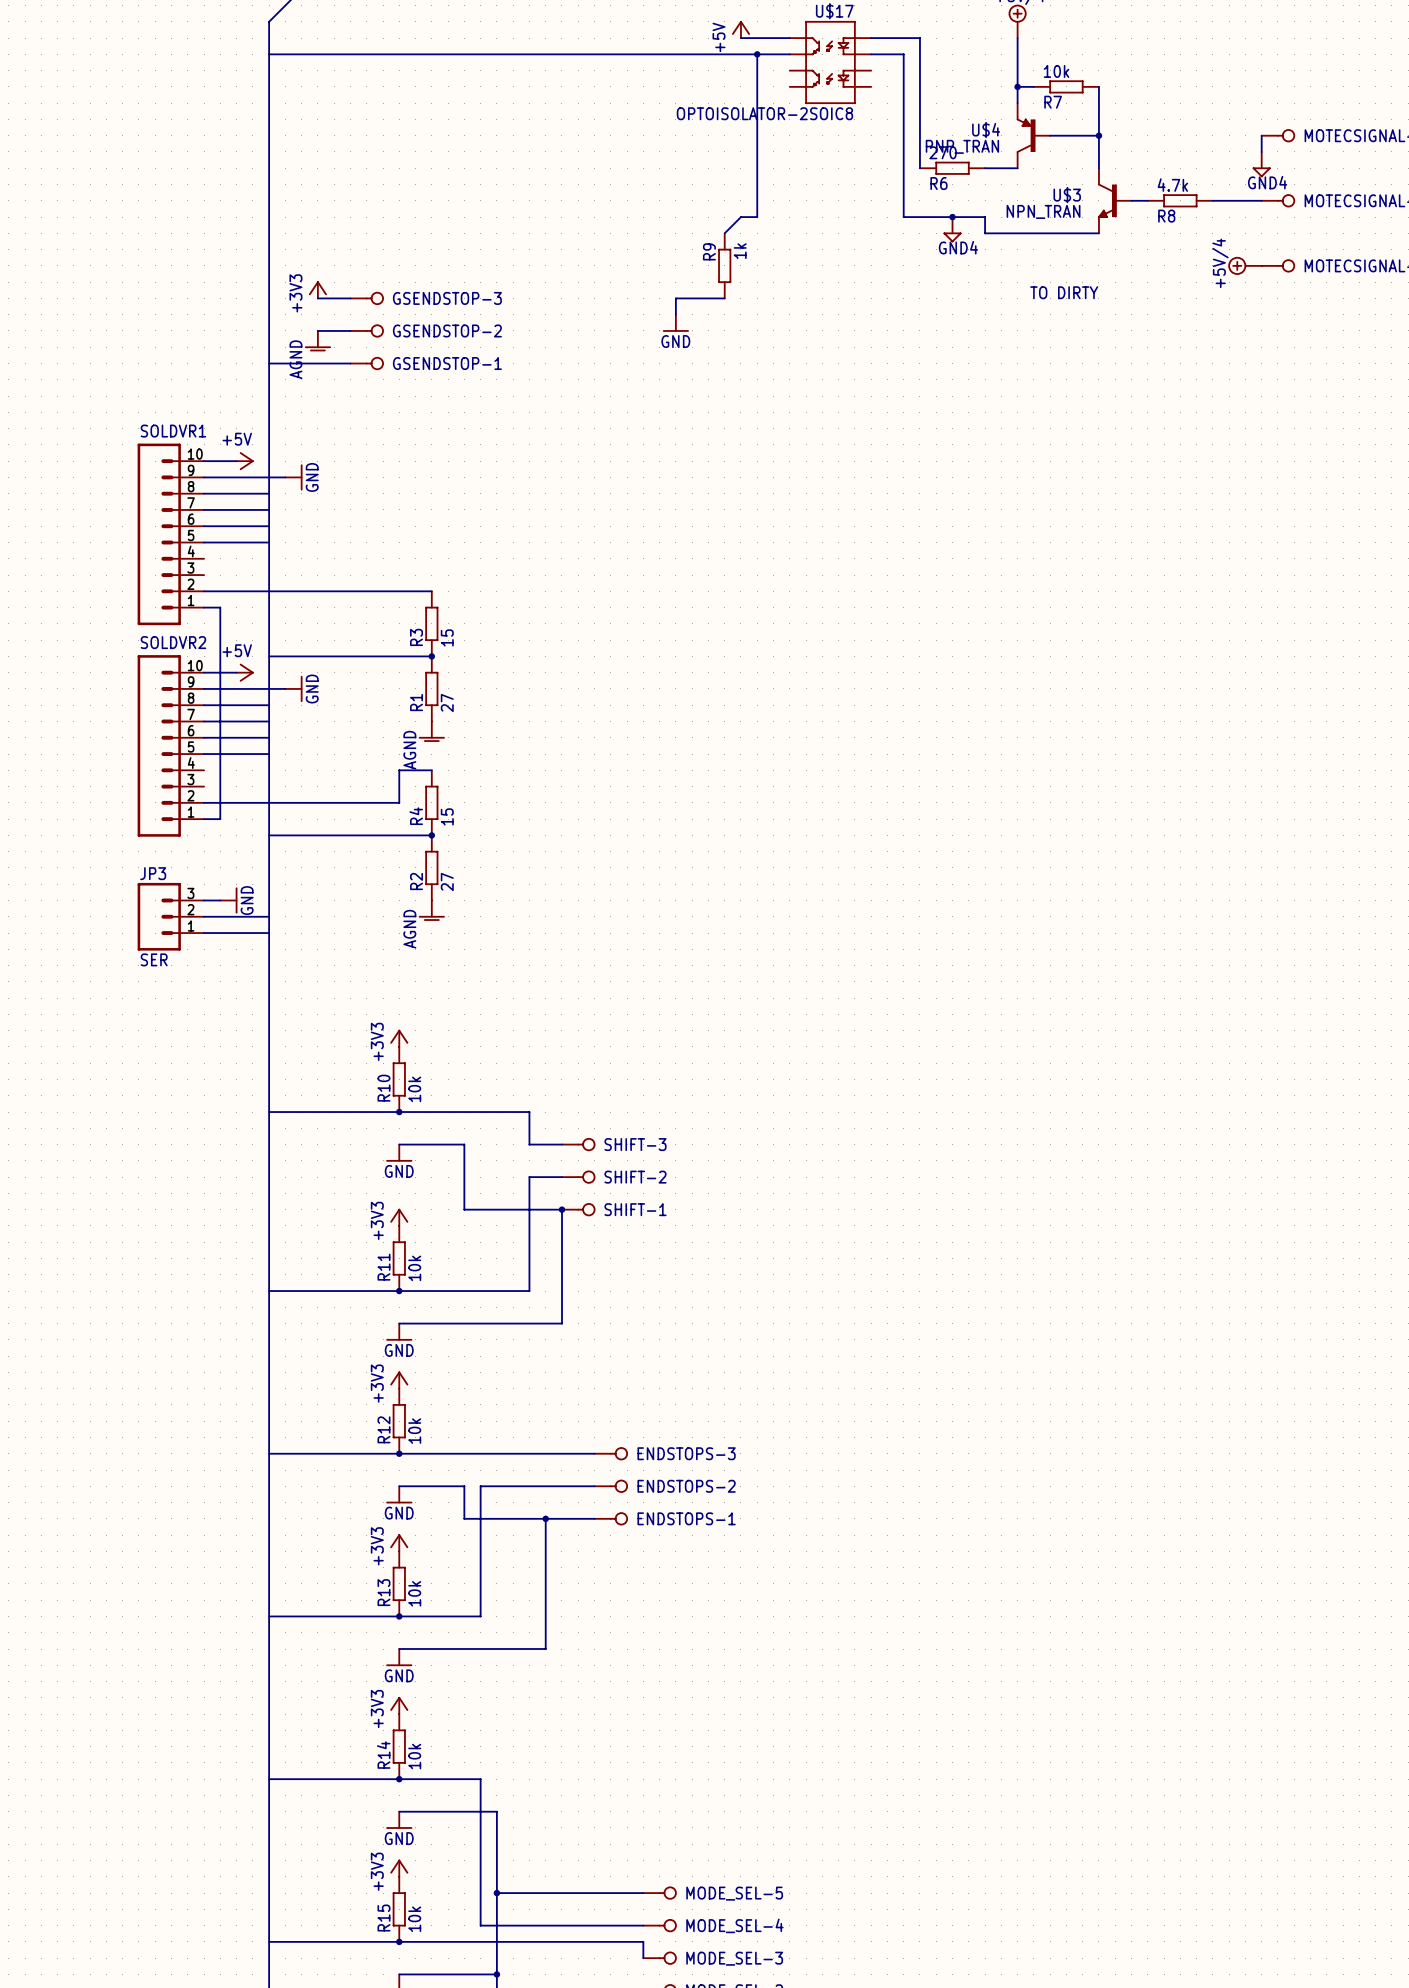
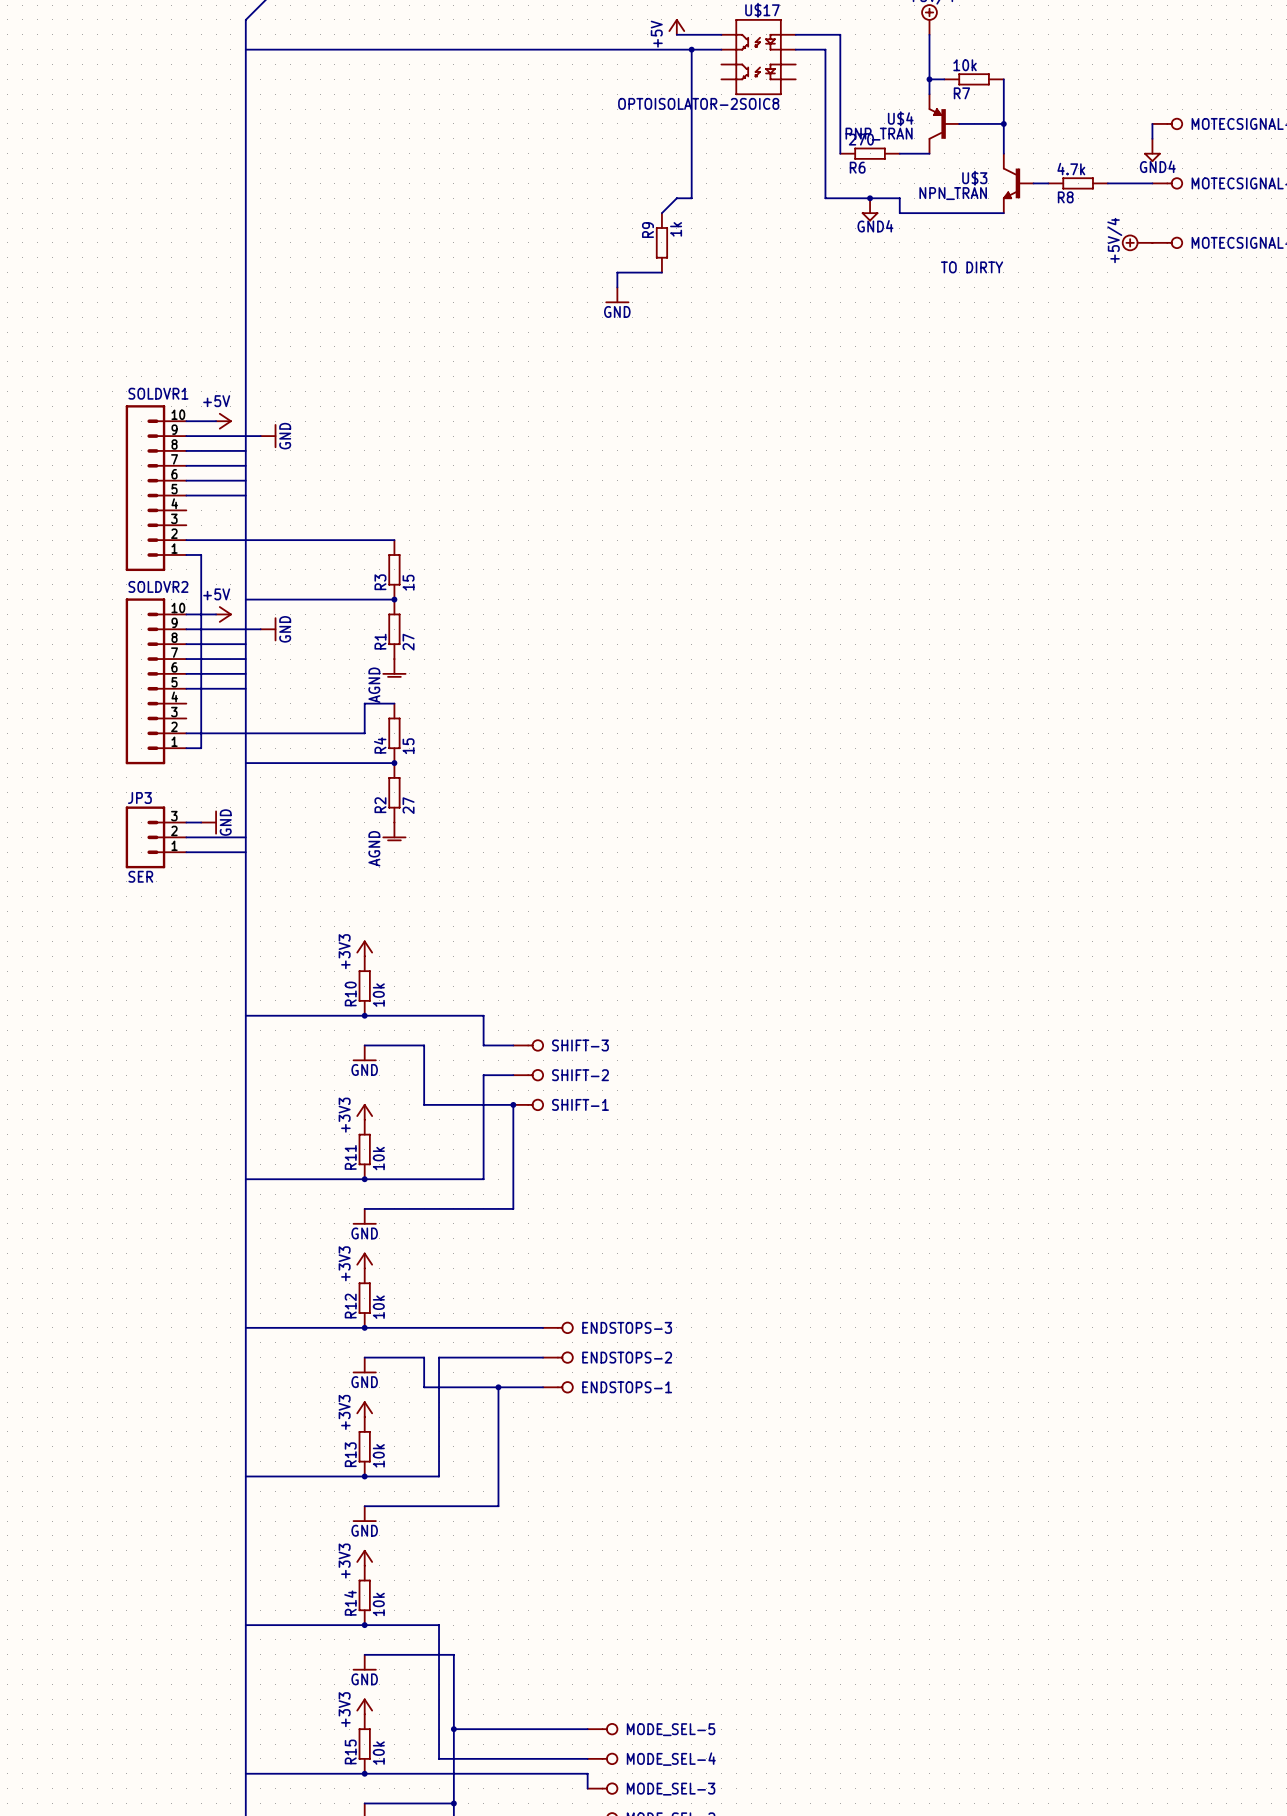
power symbol: +3V3 (317, 289) -> none
wire: (317, 298) (350, 298) -> none
GSENDSTOP-3: (367, 298) -> none
wire: (317, 330) (350, 330) -> none
GSENDSTOP-2: (367, 330) -> none
power symbol: AGND (317, 341) -> none
wire: (269, 363) (350, 363) -> none
GSENDSTOP-1: (367, 363) -> none

